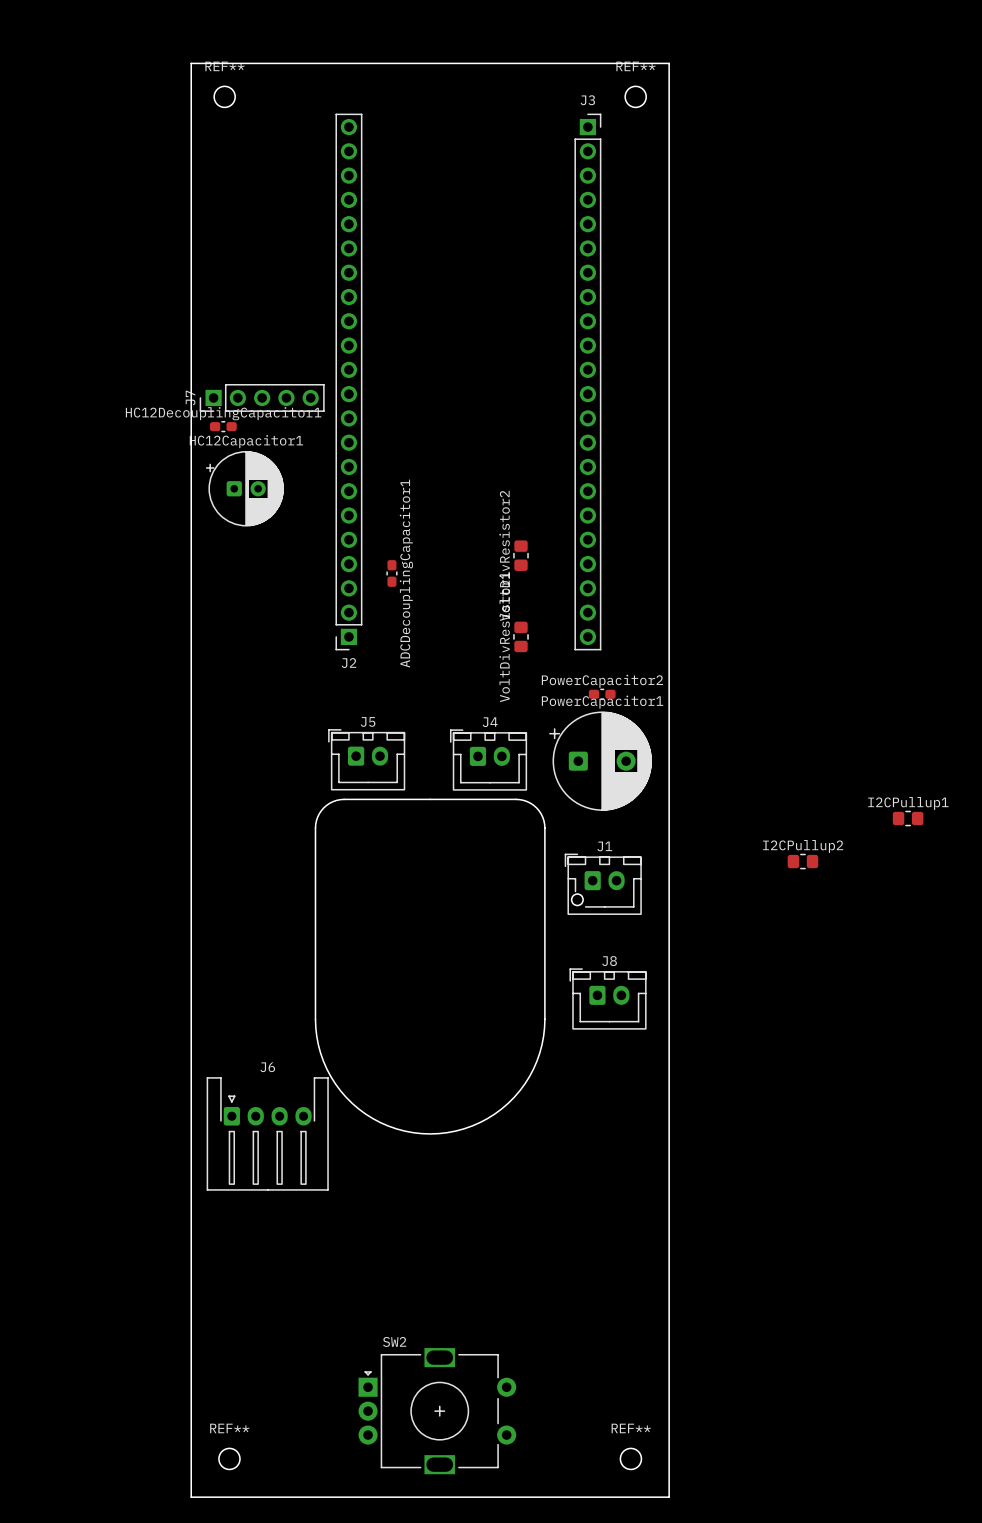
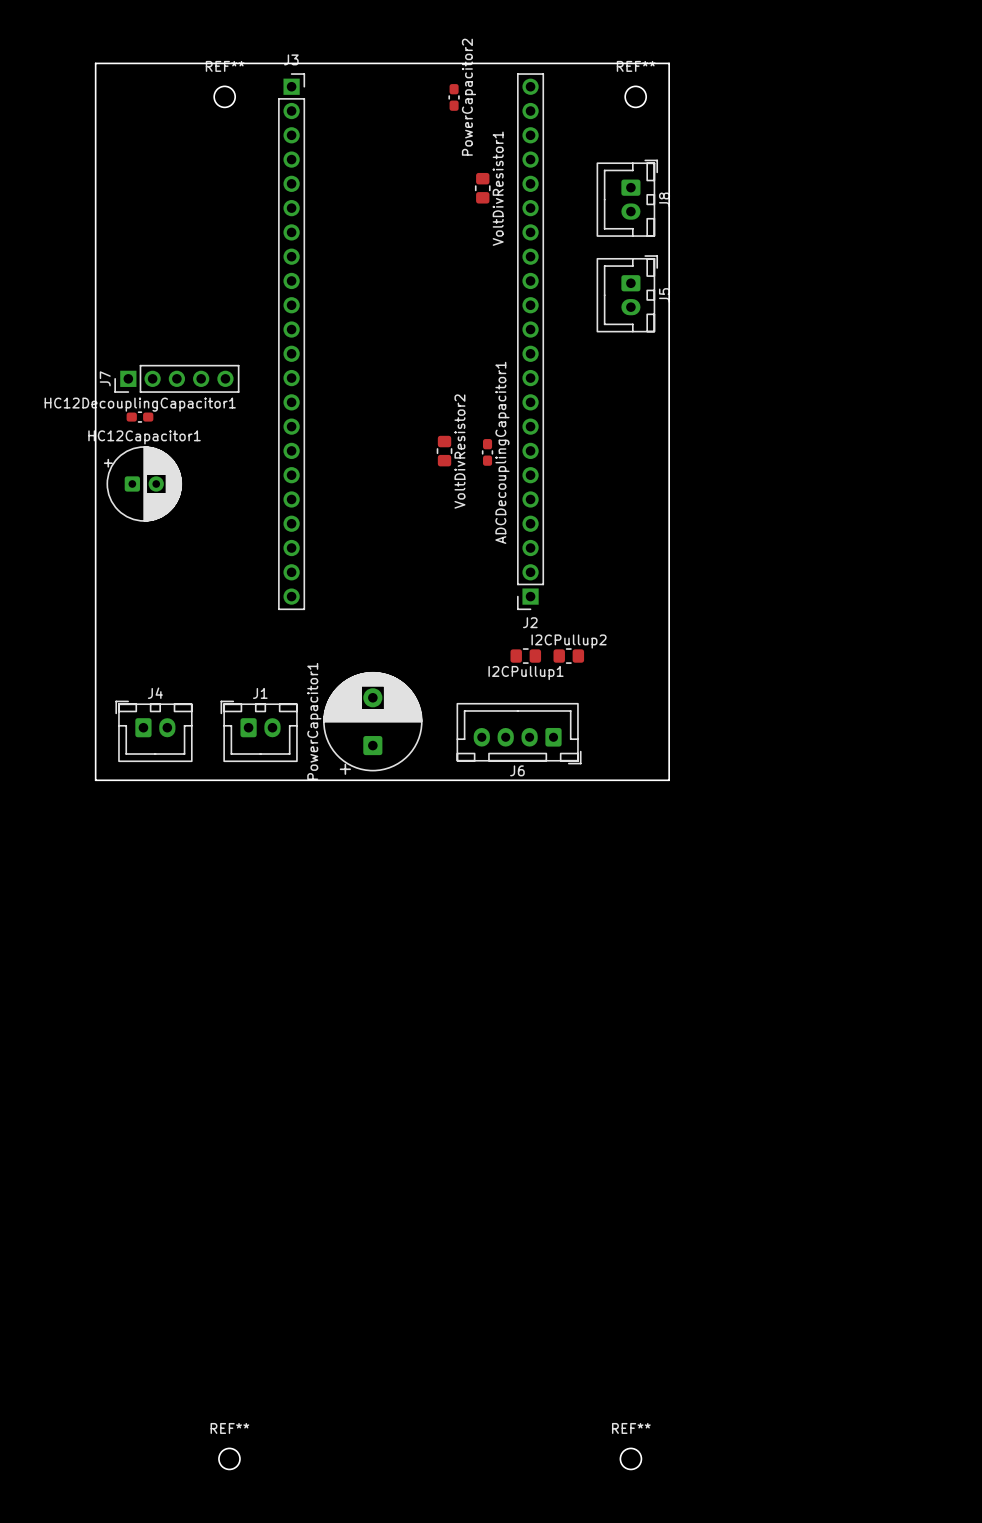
board edge: (191, 63) (191, 1497) (669, 1497) (669, 780) -> (191, 63) (95, 63) (95, 780) (669, 780)
J2 position: (348, 381) -> (530, 341)
J3 position: (587, 381) -> (291, 341)
J7 position: (262, 397) -> (176, 378)
HC12DecouplingCapacitor1 position: (223, 426) -> (139, 417)
HC12Capacitor1 position: (244, 488) -> (142, 483)
VoltDivResistor2 name position: VoltDivResistor2 (504, 555) -> VoltDivResistor2 (459, 451)
VoltDivResistor2 position: (520, 555) -> (444, 451)
ADCDecouplingCapacitor1 position: (391, 573) -> (487, 452)
VoltDivResistor1 name position: VoltDivResistor1 (504, 636) -> VoltDivResistor1 (498, 188)
VoltDivResistor1 position: (520, 636) -> (482, 188)
PowerCapacitor2 rotation: 0° (602, 694) -> 90° clockwise (454, 97)
PowerCapacitor2 position: (602, 694) -> (454, 97)
J5 rotation: 0° (366, 759) -> 90° clockwise (627, 293)
J5 position: (366, 759) -> (627, 293)
J4 position: (488, 760) -> (154, 731)
PowerCapacitor1 rotation: 0° (600, 761) -> 90° counterclockwise (372, 723)
PowerCapacitor1 position: (600, 761) -> (372, 723)
board edge: (344, 799) (519, 799) (533, 805) (542, 817) (544, 828) (544, 1019) (542, 1044) (533, 1069) (514, 1097) (494, 1114) (472, 1126) (455, 1131) (430, 1133) (404, 1131) (388, 1126) (365, 1114) (346, 1097) (330, 1076) (323, 1061) (318, 1044) (315, 1019) (315, 824) (319, 813) (326, 805) (344, 799) -> none
I2CPullup1 name position: I2CPullup1 (908, 803) -> I2CPullup1 (526, 673)
I2CPullup1 position: (908, 818) -> (525, 656)
J1 footprint: [564, 853, 642, 915] -> [220, 700, 298, 762]
I2CPullup2 position: (802, 861) -> (568, 656)
J8 rotation: 0° (608, 998) -> 90° clockwise (627, 198)
J8 position: (608, 998) -> (627, 198)
J6 name position: J6 (267, 1067) -> J6 (517, 770)
J6 footprint: [206, 1077, 329, 1191] -> [456, 703, 582, 765]
SW2: (437, 1411) -> none

